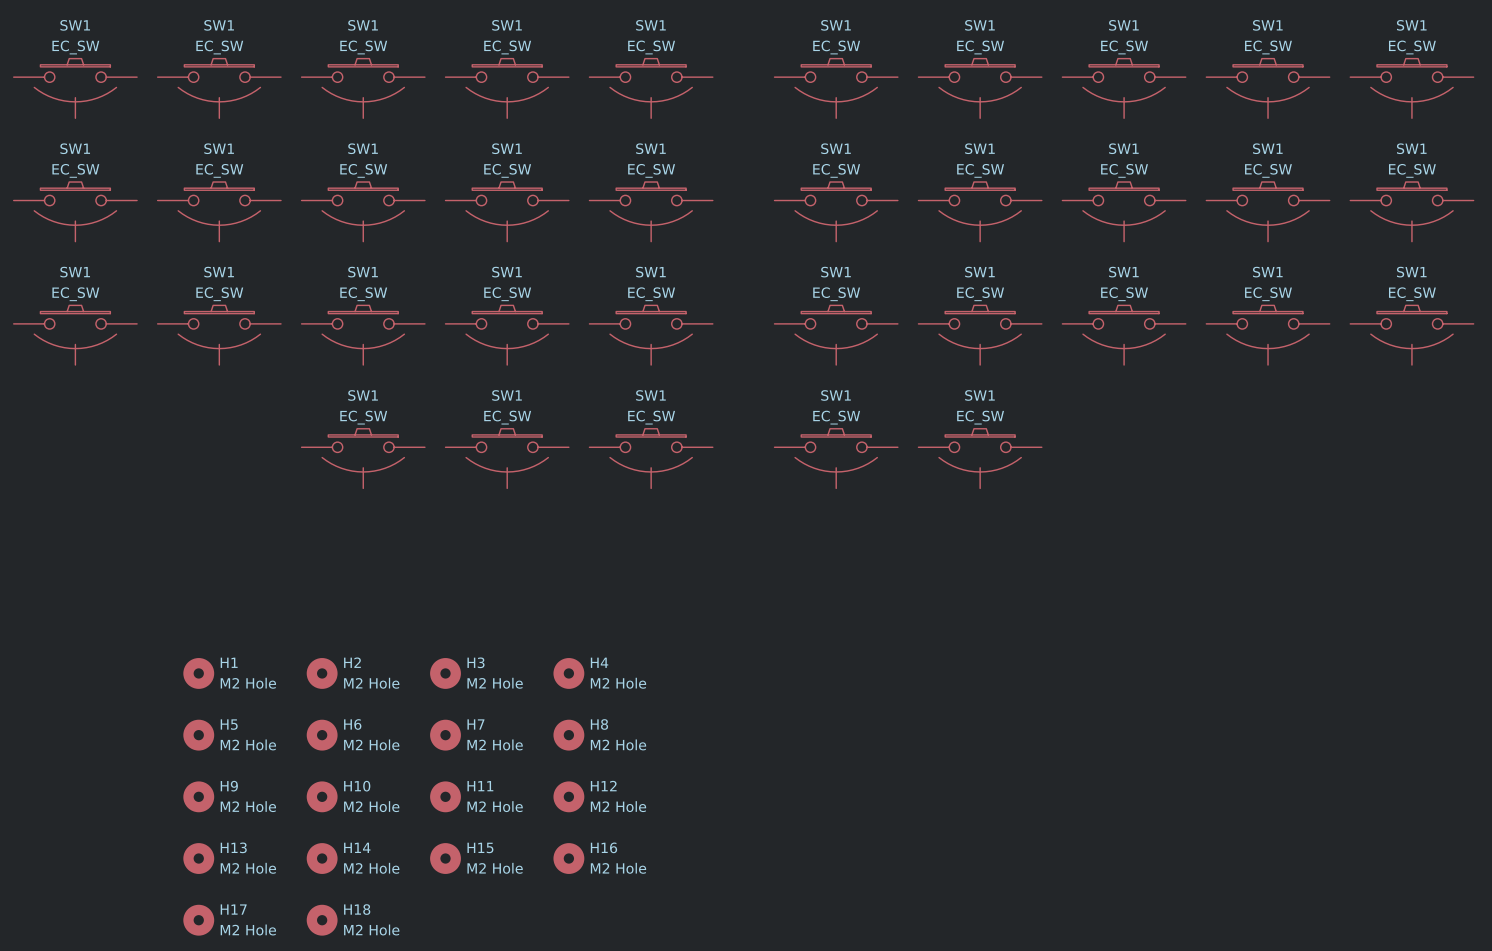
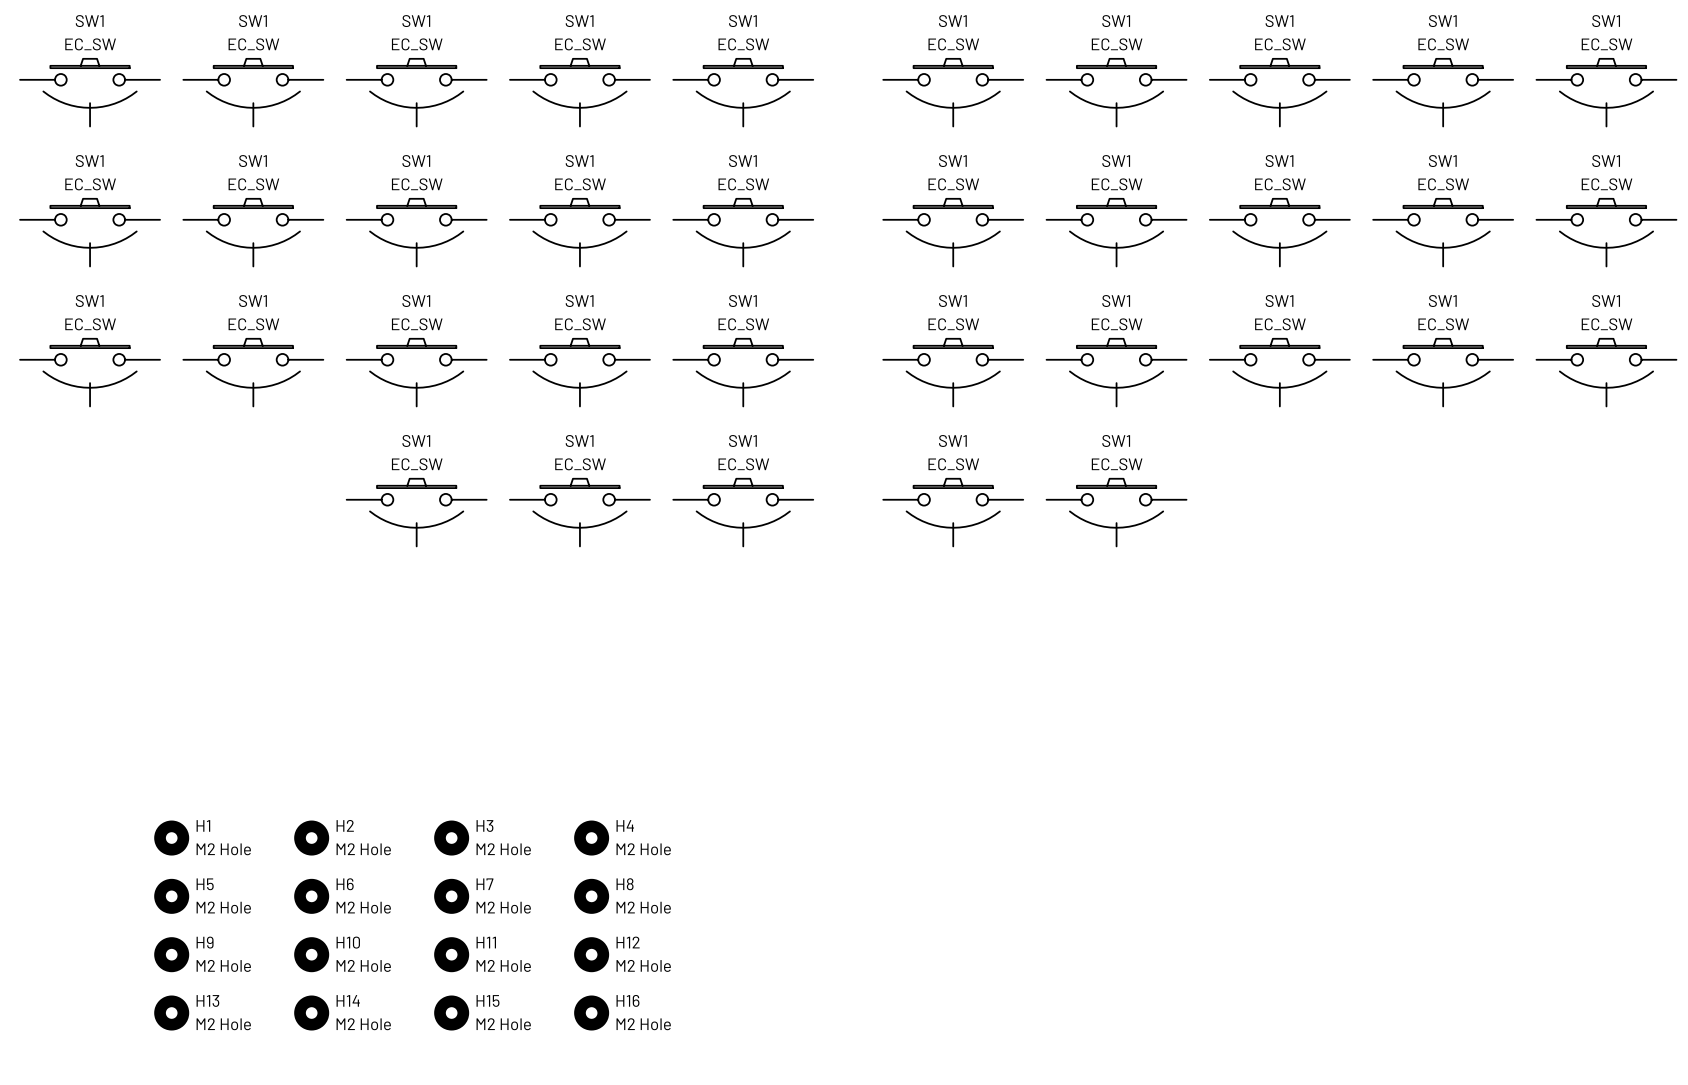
H1 position: (198, 673) -> (171, 838)
H2 position: (322, 673) -> (311, 838)
H3 position: (445, 673) -> (451, 838)
H4 position: (568, 673) -> (591, 838)
H5 position: (198, 735) -> (171, 896)
H6 position: (322, 735) -> (311, 896)
H7 position: (445, 735) -> (451, 896)
H8 position: (568, 735) -> (591, 896)
H9 position: (198, 796) -> (171, 954)
H10 position: (322, 796) -> (311, 954)
H11 position: (445, 796) -> (451, 954)
H12 position: (568, 796) -> (591, 954)
H13 position: (198, 858) -> (171, 1013)
H14 position: (322, 858) -> (311, 1013)
H15 position: (445, 858) -> (451, 1013)
H16 position: (568, 858) -> (591, 1013)
H17: M2 Hole (198, 920) -> none
H18: M2 Hole (322, 920) -> none

